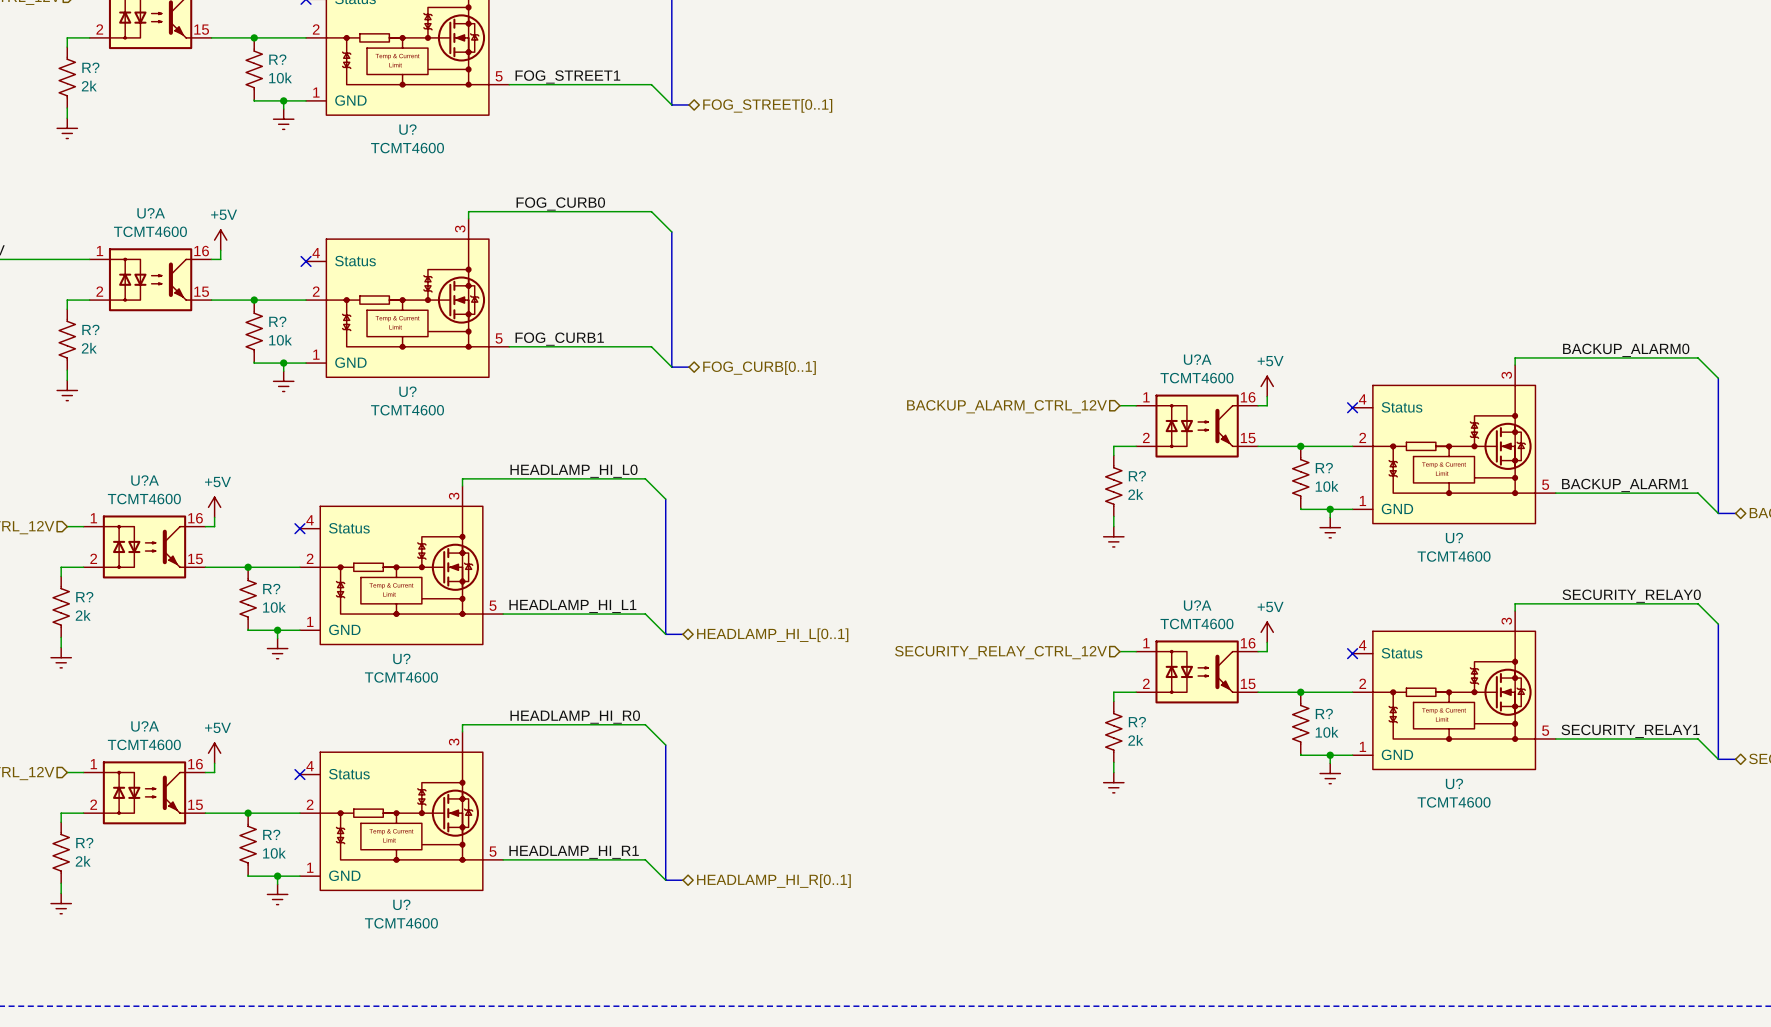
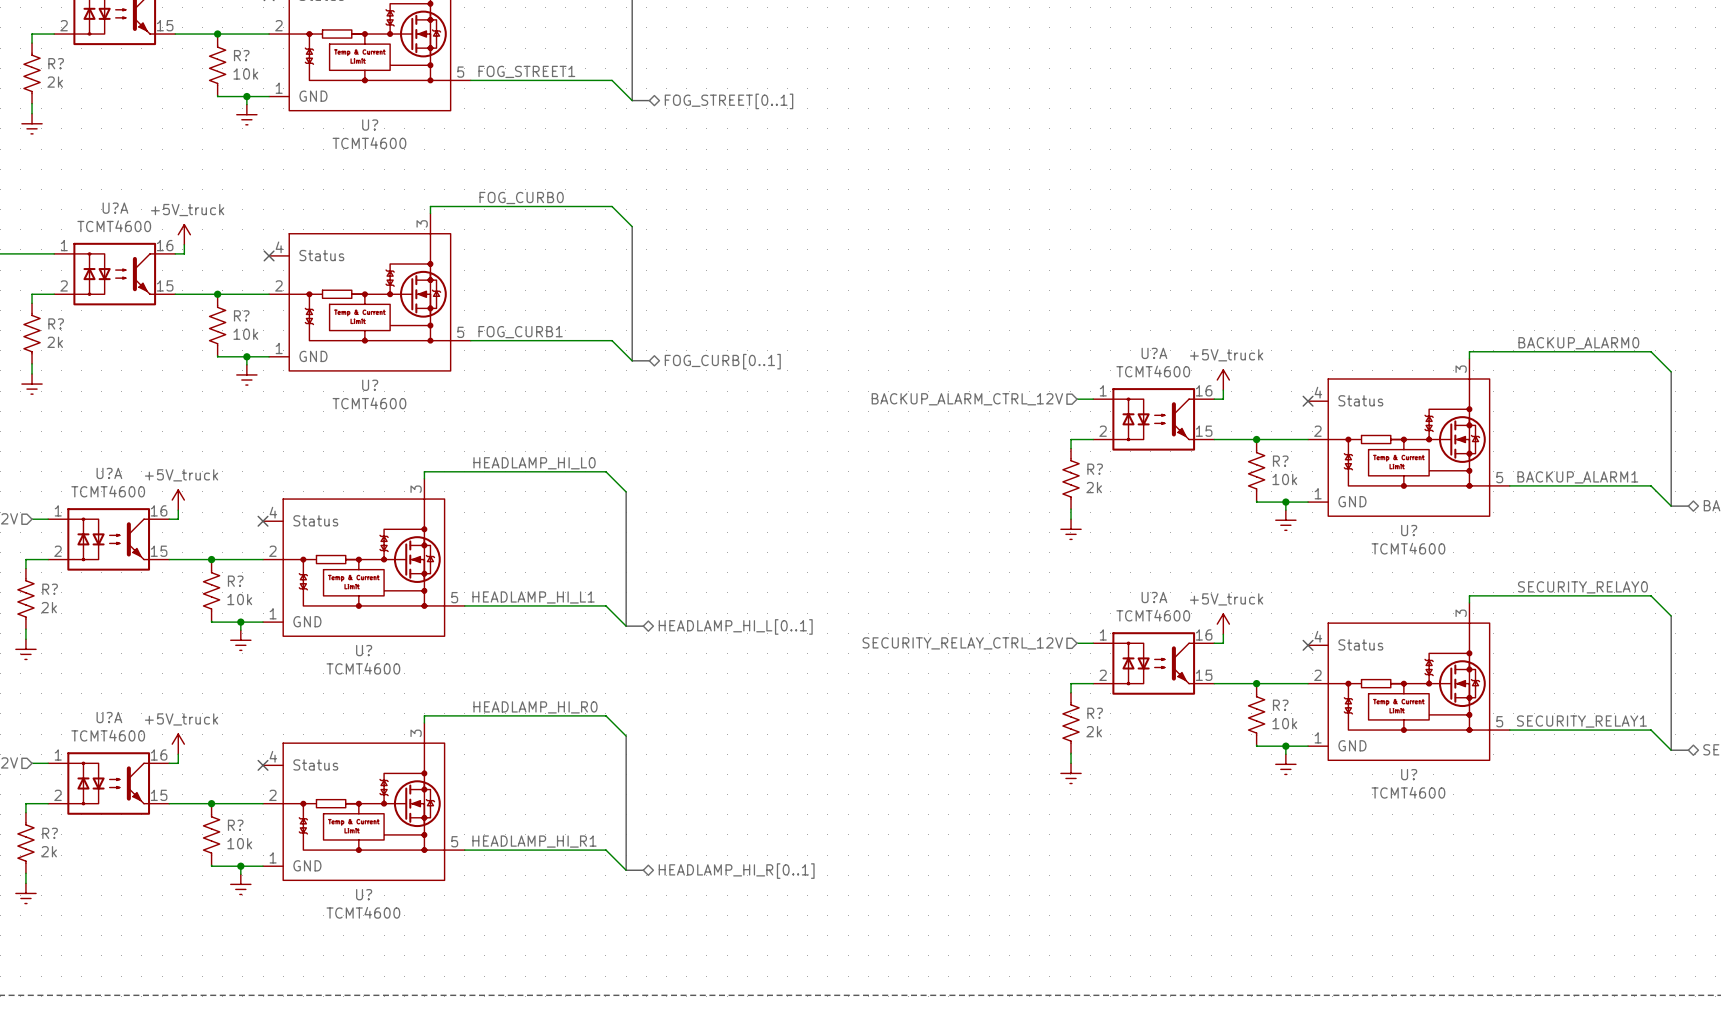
power symbol: +5V (220, 240) -> +5V_truck (184, 234)
power symbol: +5V (1267, 386) -> +5V_truck (1223, 380)
power symbol: +5V (214, 507) -> +5V_truck (178, 500)
power symbol: +5V (1267, 632) -> +5V_truck (1223, 624)
power symbol: +5V (214, 753) -> +5V_truck (178, 744)

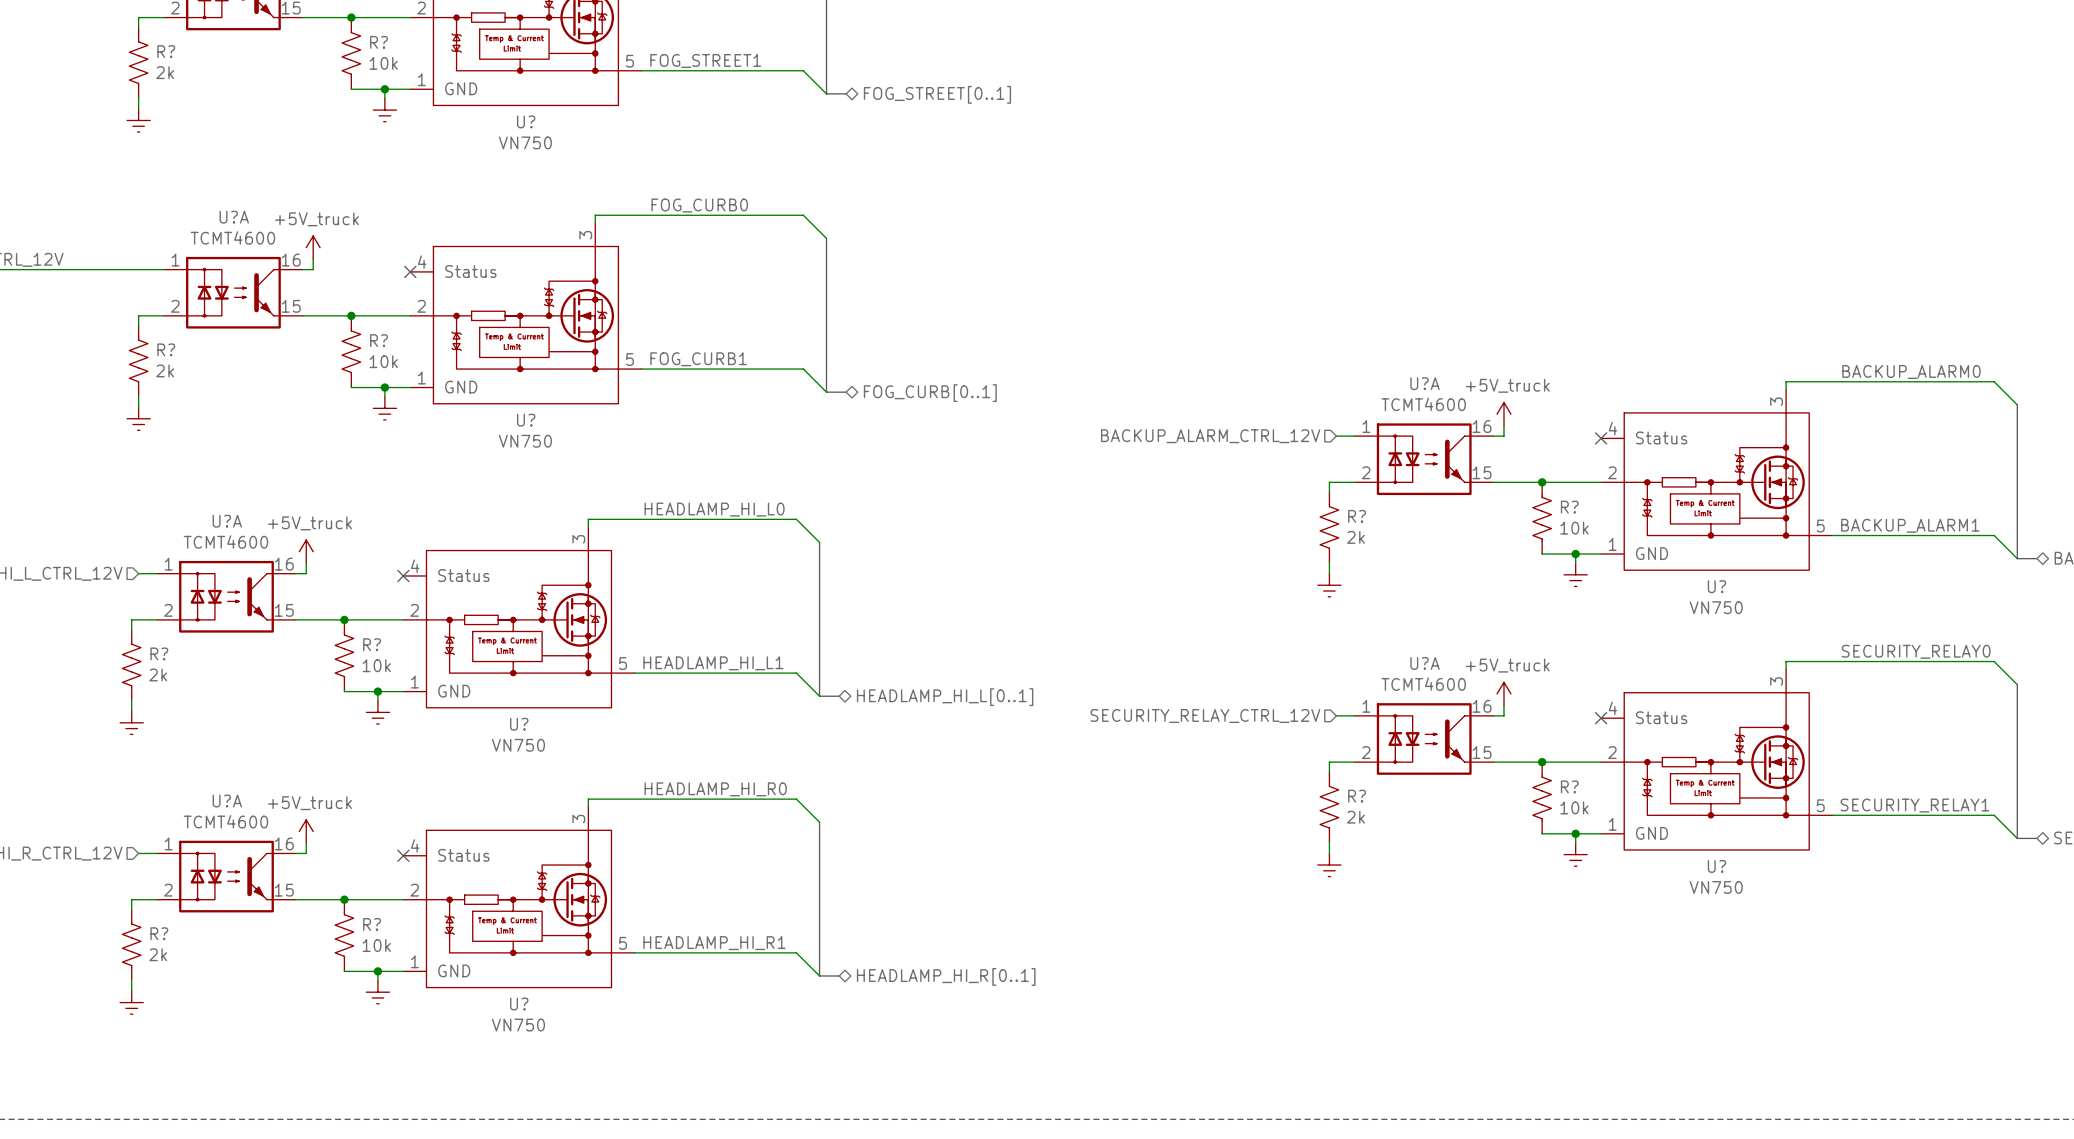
U? value: TCMT4600 (369, 143) -> VN750 (525, 142)
U? value: TCMT4600 (369, 403) -> VN750 (525, 441)
U? value: TCMT4600 (1408, 548) -> VN750 (1716, 607)
U? value: TCMT4600 (363, 668) -> VN750 (518, 745)
U? value: TCMT4600 (1408, 792) -> VN750 (1716, 887)
U? value: TCMT4600 (363, 912) -> VN750 (518, 1025)

